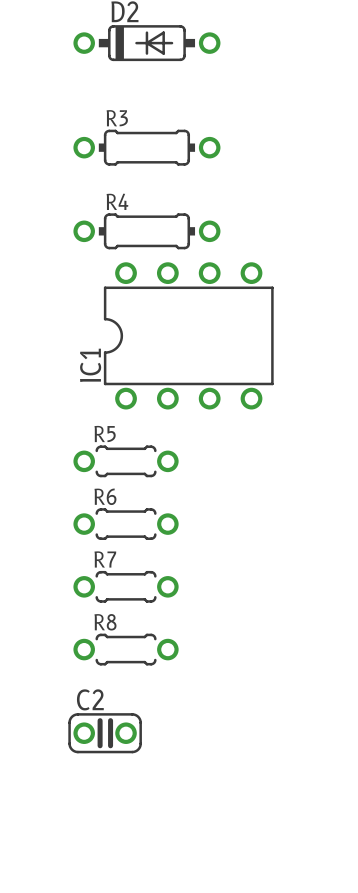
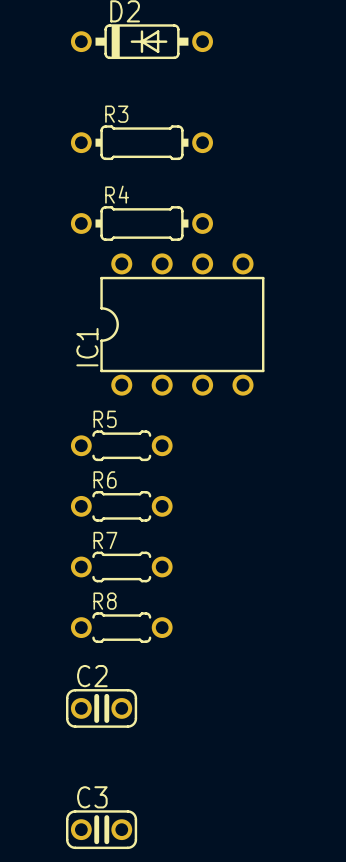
C3: none -> (101, 829)

